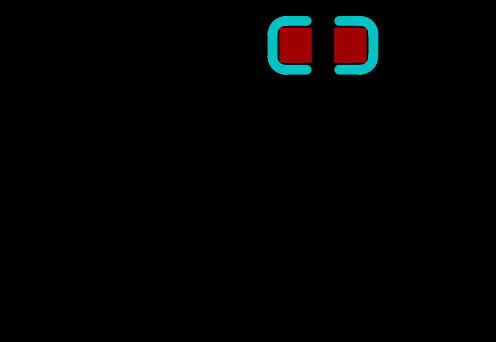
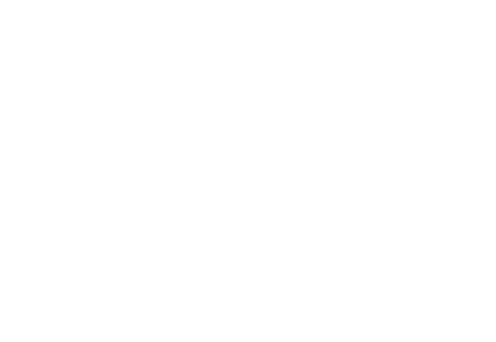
part: (322, 45) -> none

